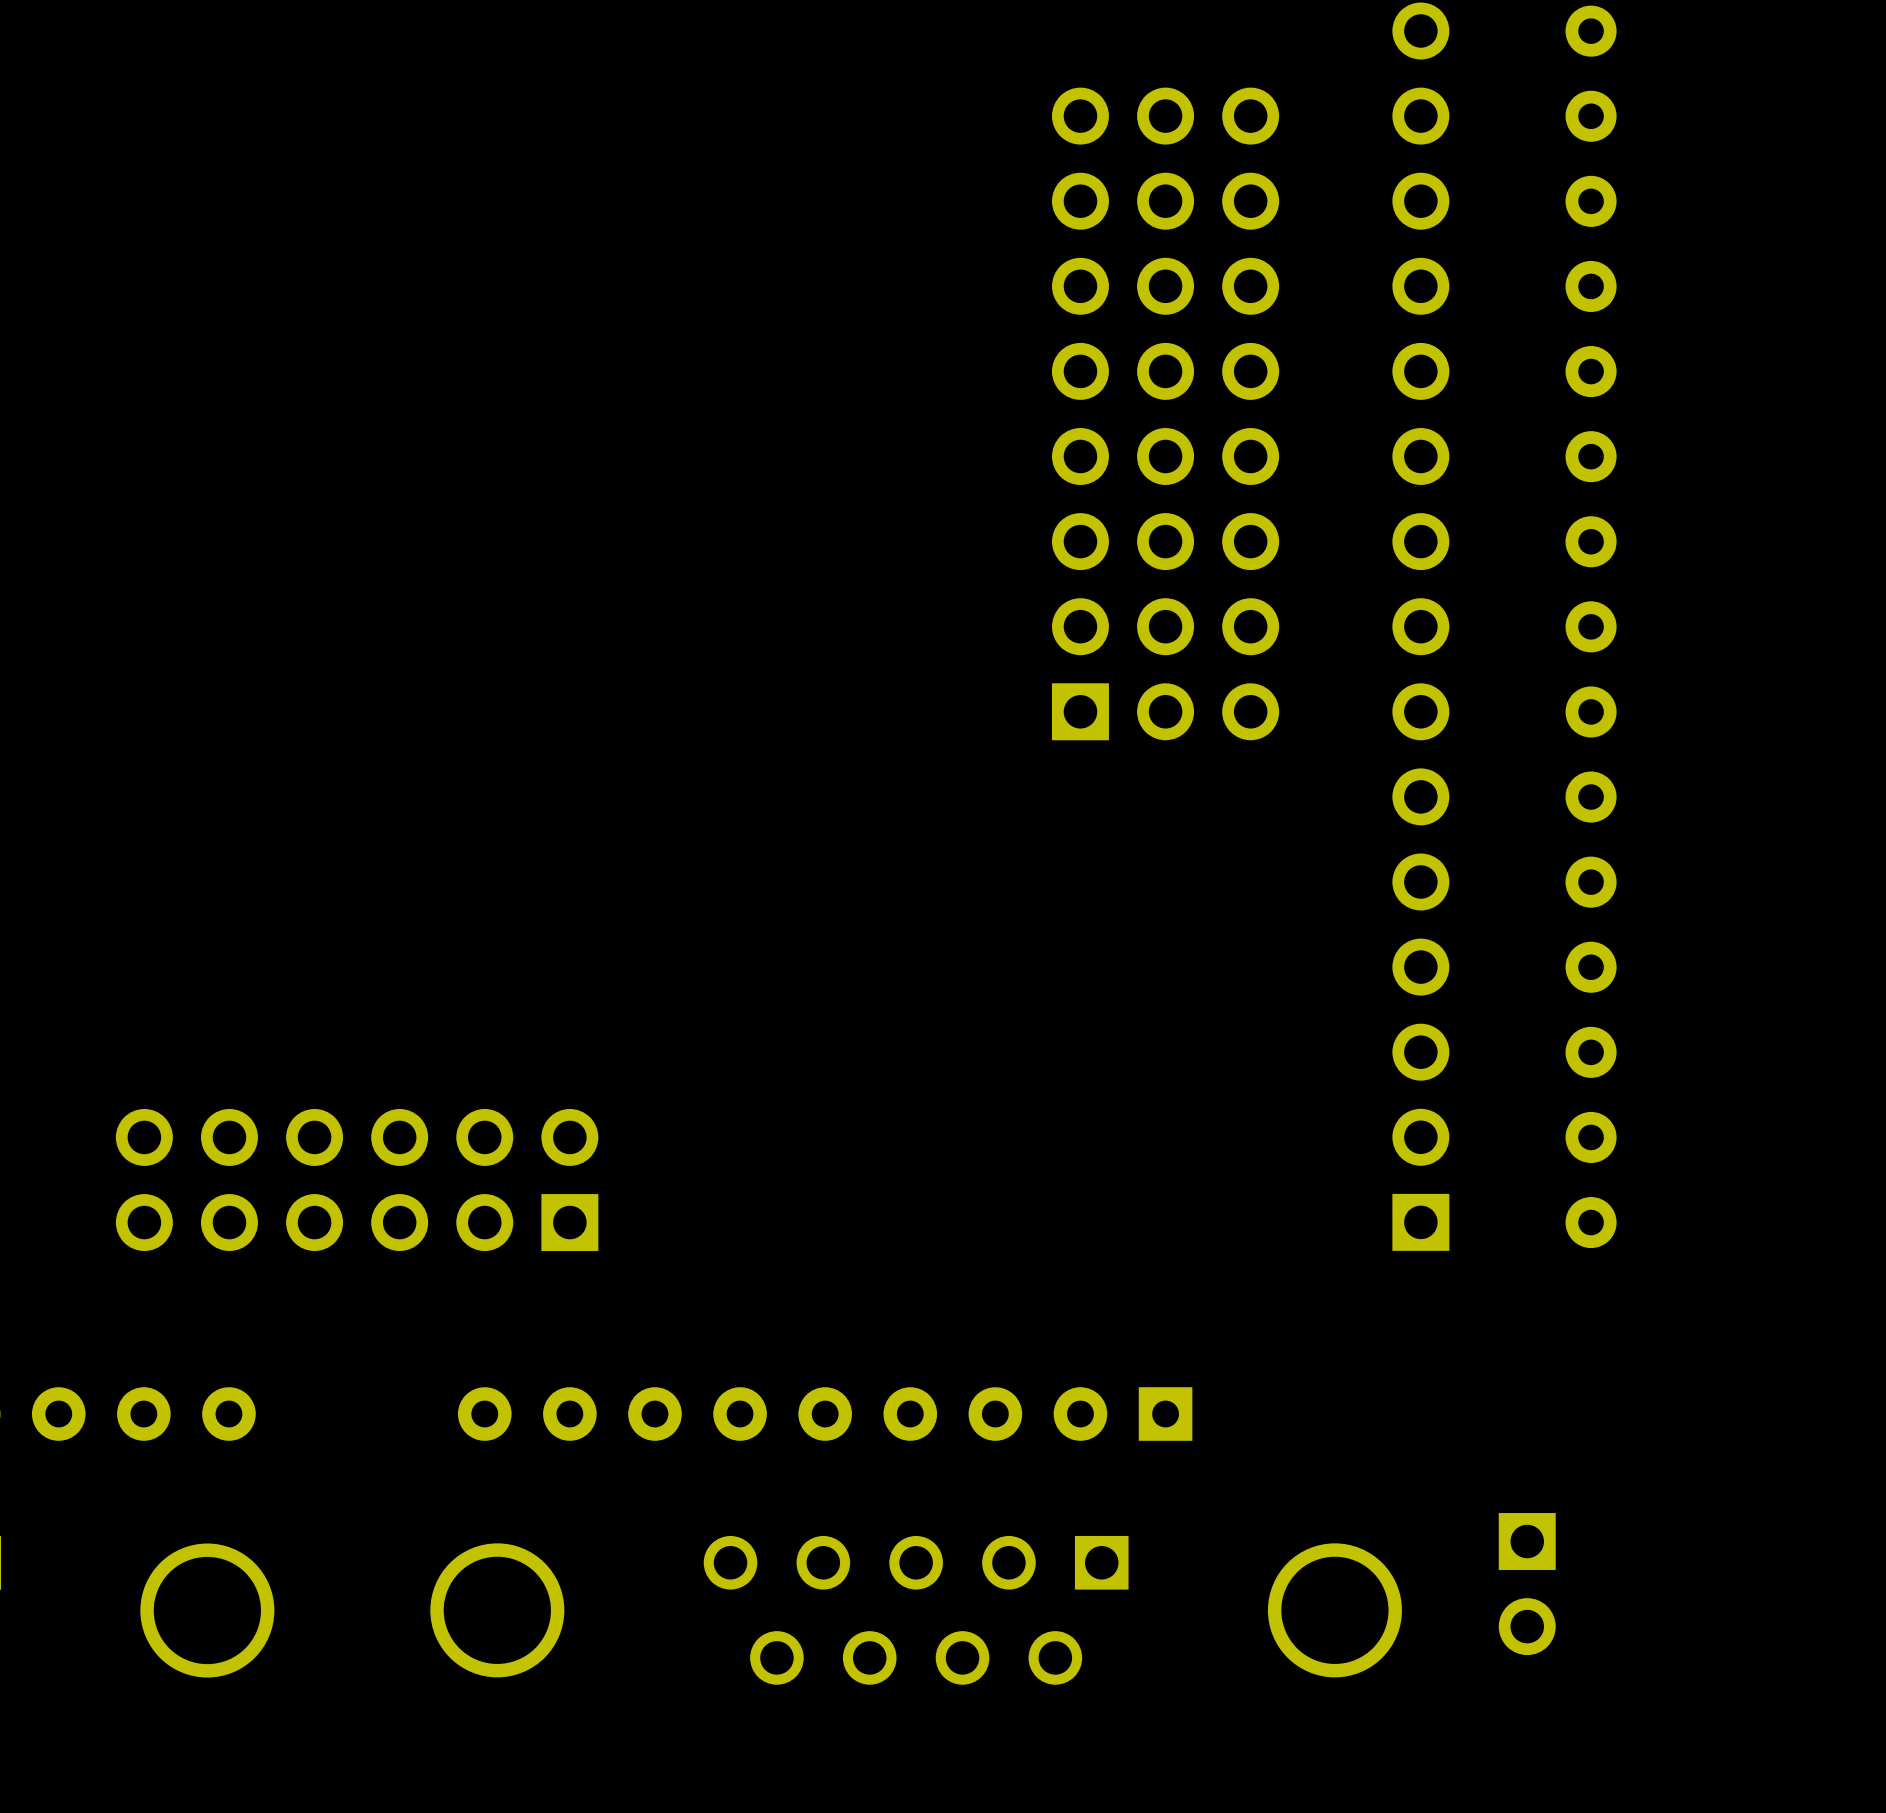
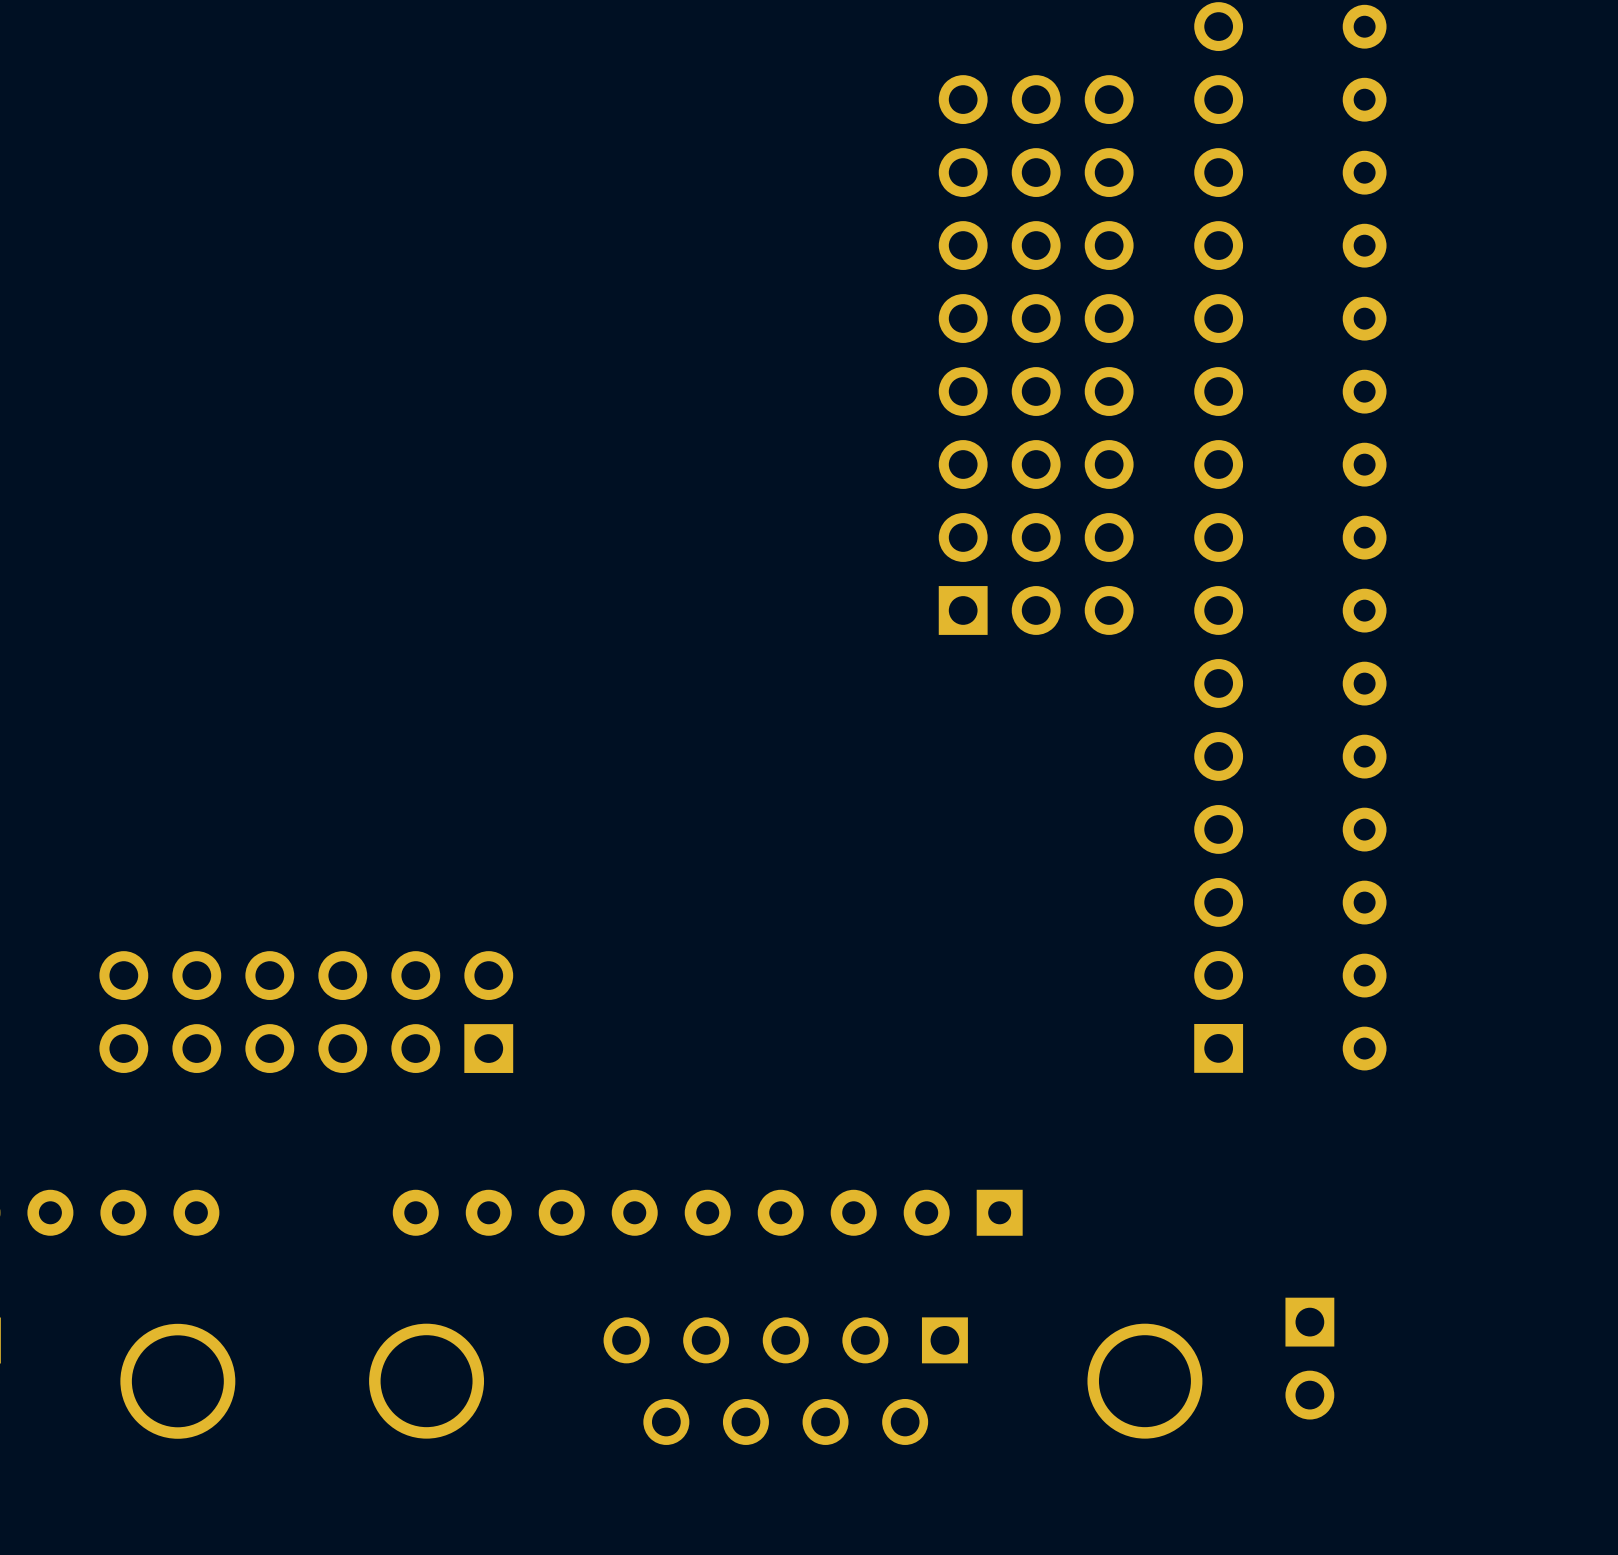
part position: (1165, 413) -> (1036, 355)

